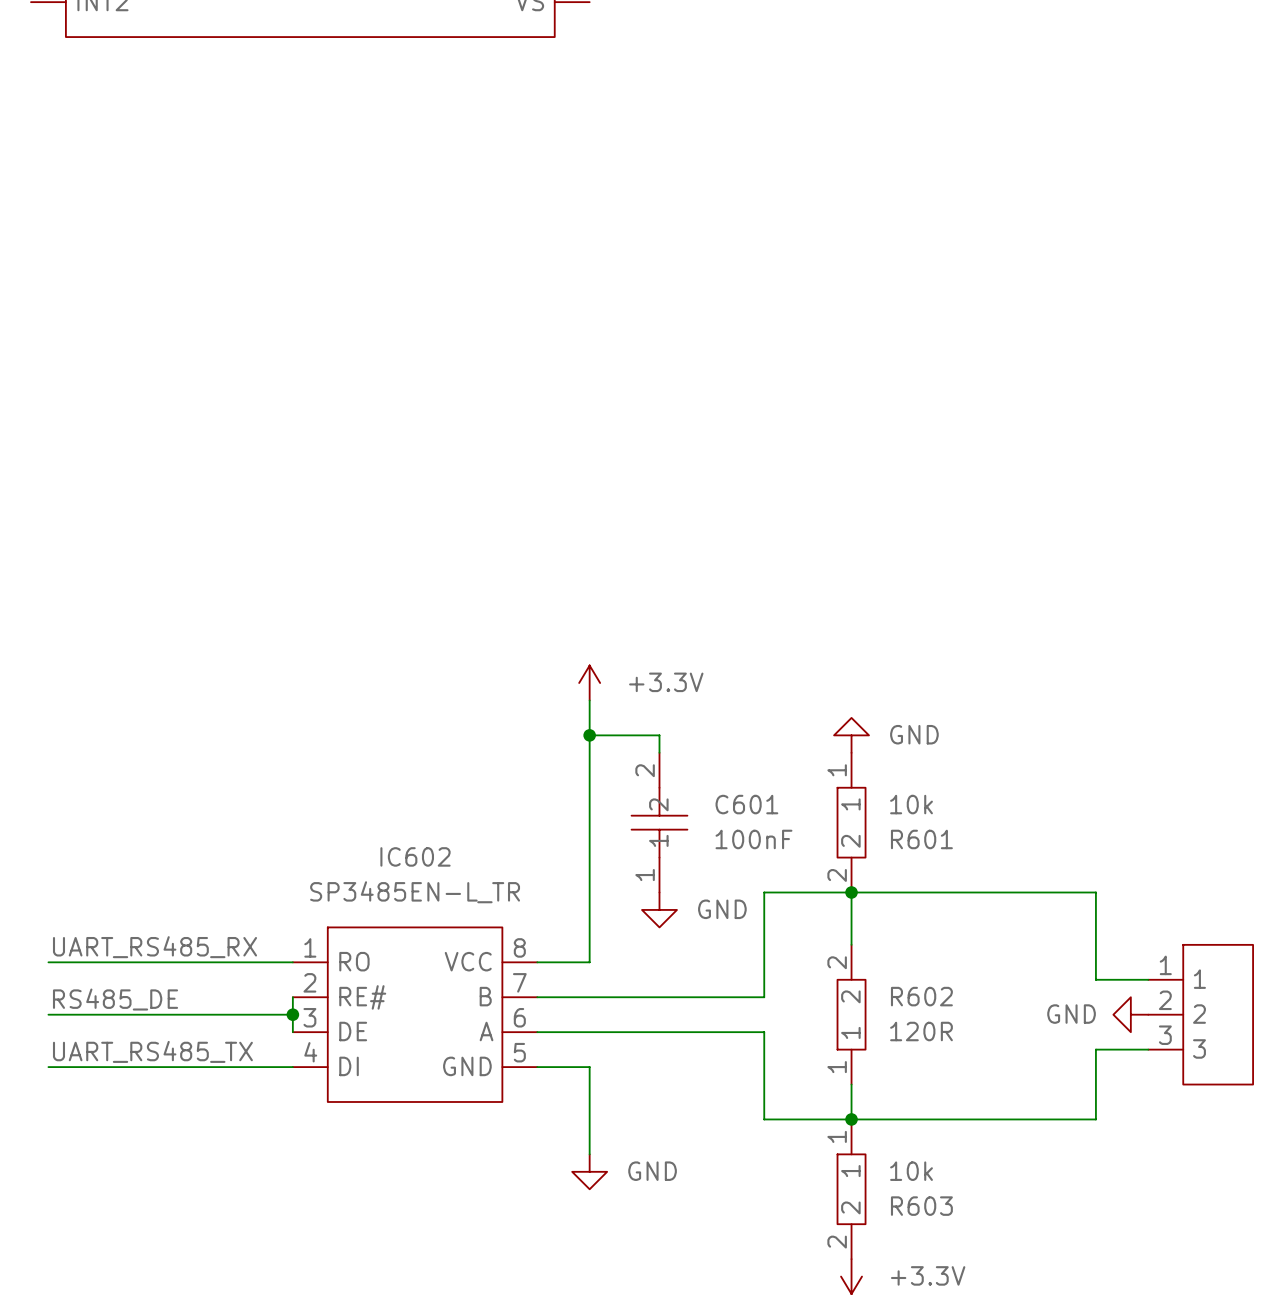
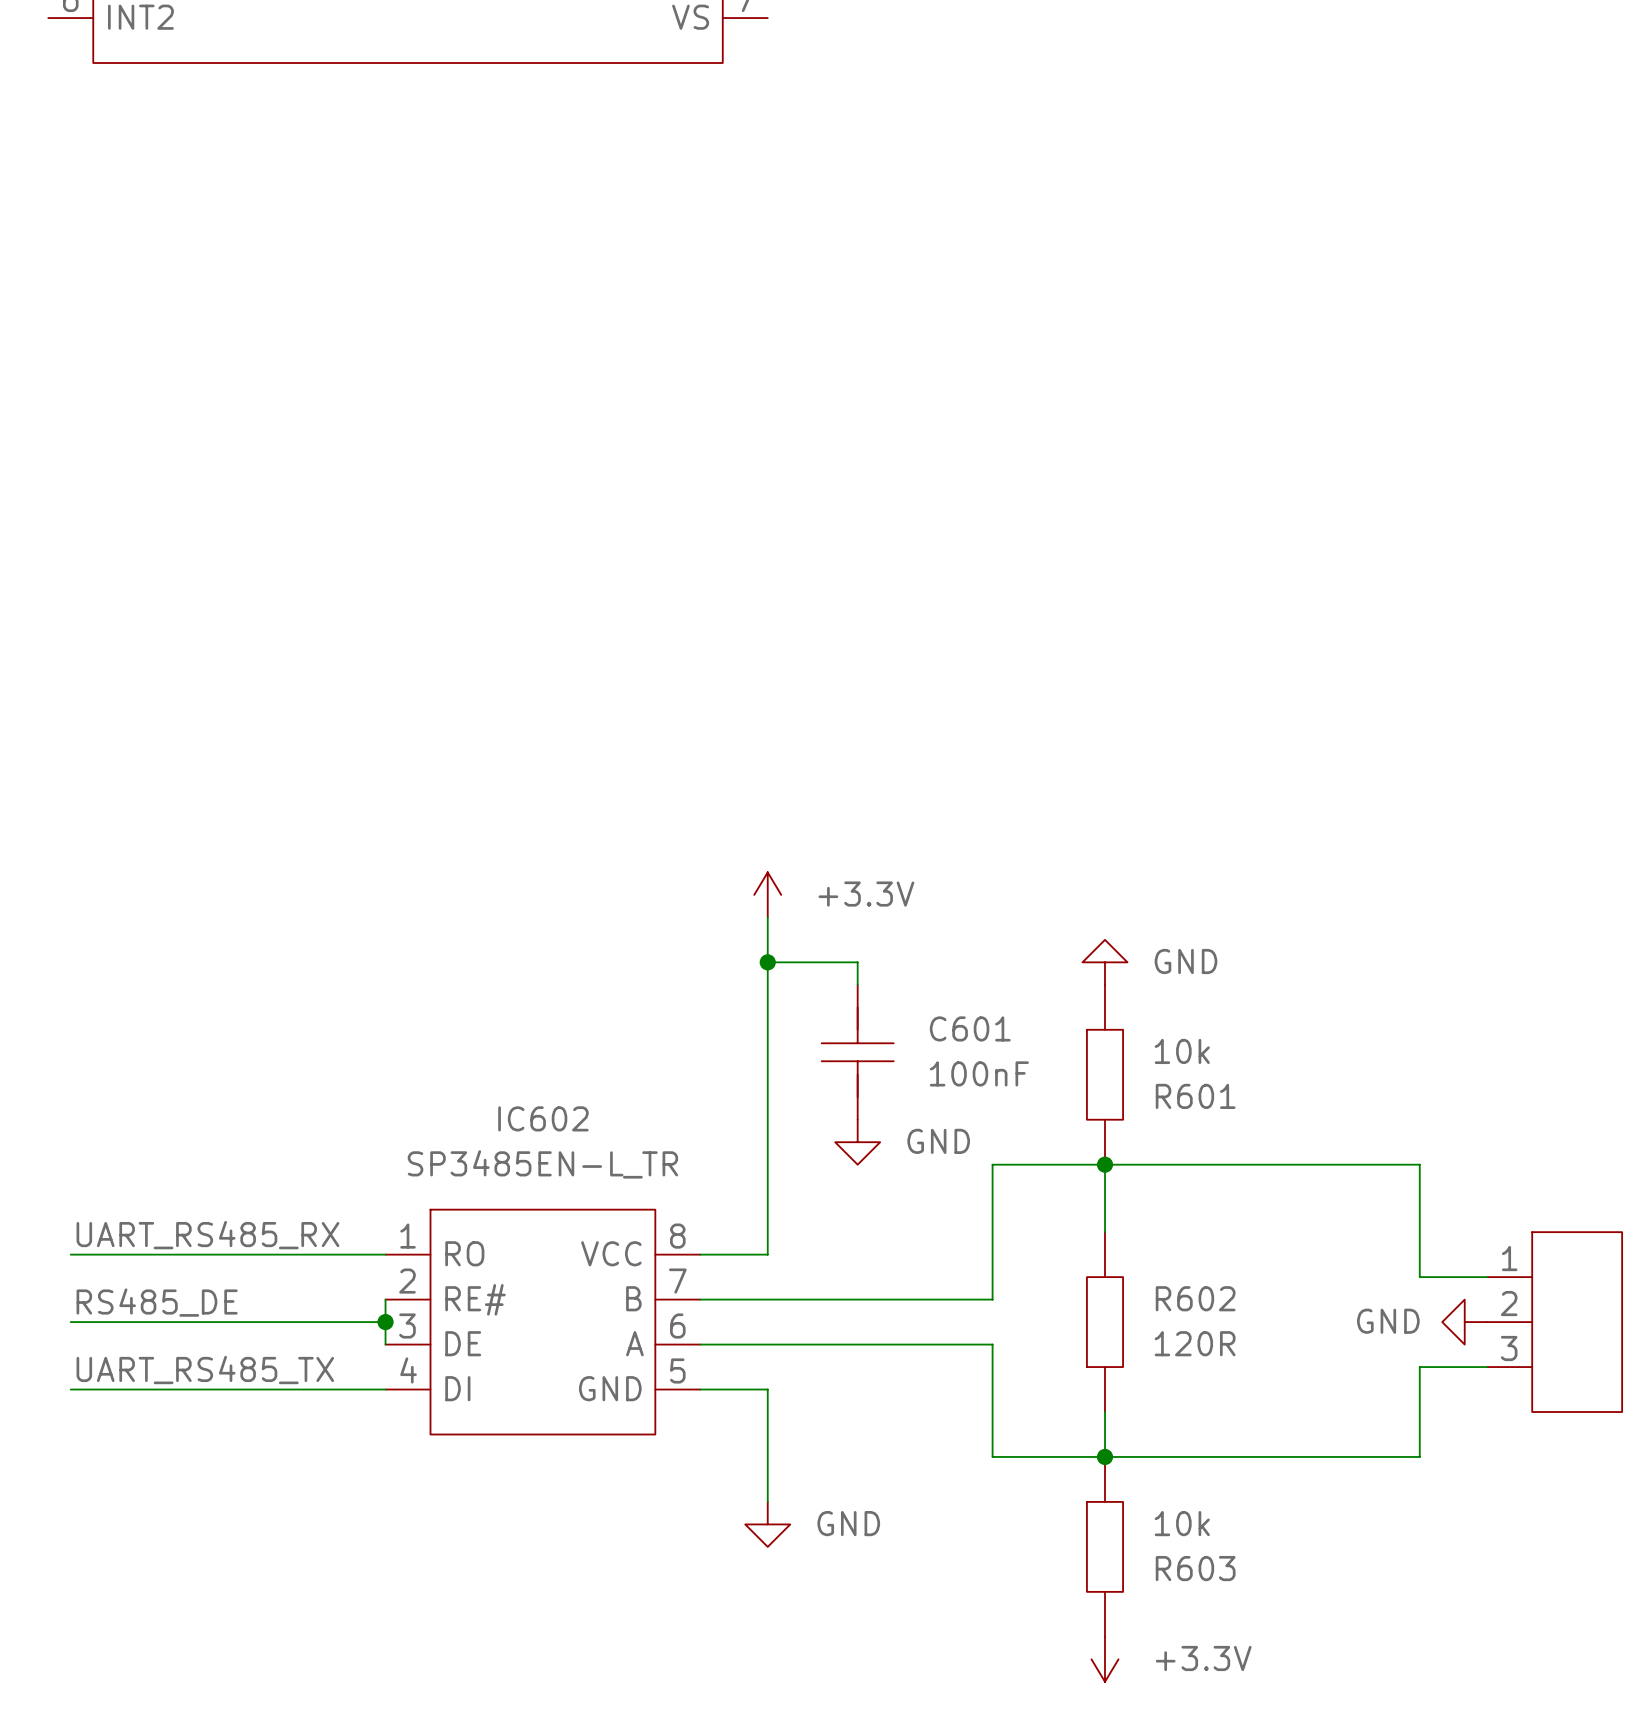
C601 symbol: [631, 752, 688, 893] -> [821, 984, 894, 1120]
R601 pin number: 1 (837, 770) -> none
R601 pin name: 1 (850, 804) -> none
R601 pin name: 2 (850, 841) -> none
R601 pin number: 2 (837, 875) -> none
power symbol position: GND (659, 909) -> GND (857, 1142)
R602 pin number: 2 (837, 962) -> none
part pin name: 1 (1199, 979) -> none
R602 pin name: 2 (850, 996) -> none
part pin name: 2 (1199, 1014) -> none
R602 pin name: 1 (850, 1032) -> none
part pin name: 3 (1199, 1048) -> none
R602 pin number: 1 (837, 1067) -> none
R603 pin number: 1 (837, 1136) -> none
R603 pin name: 1 (850, 1171) -> none
R603 pin name: 2 (850, 1207) -> none
R603 pin number: 2 (837, 1242) -> none

